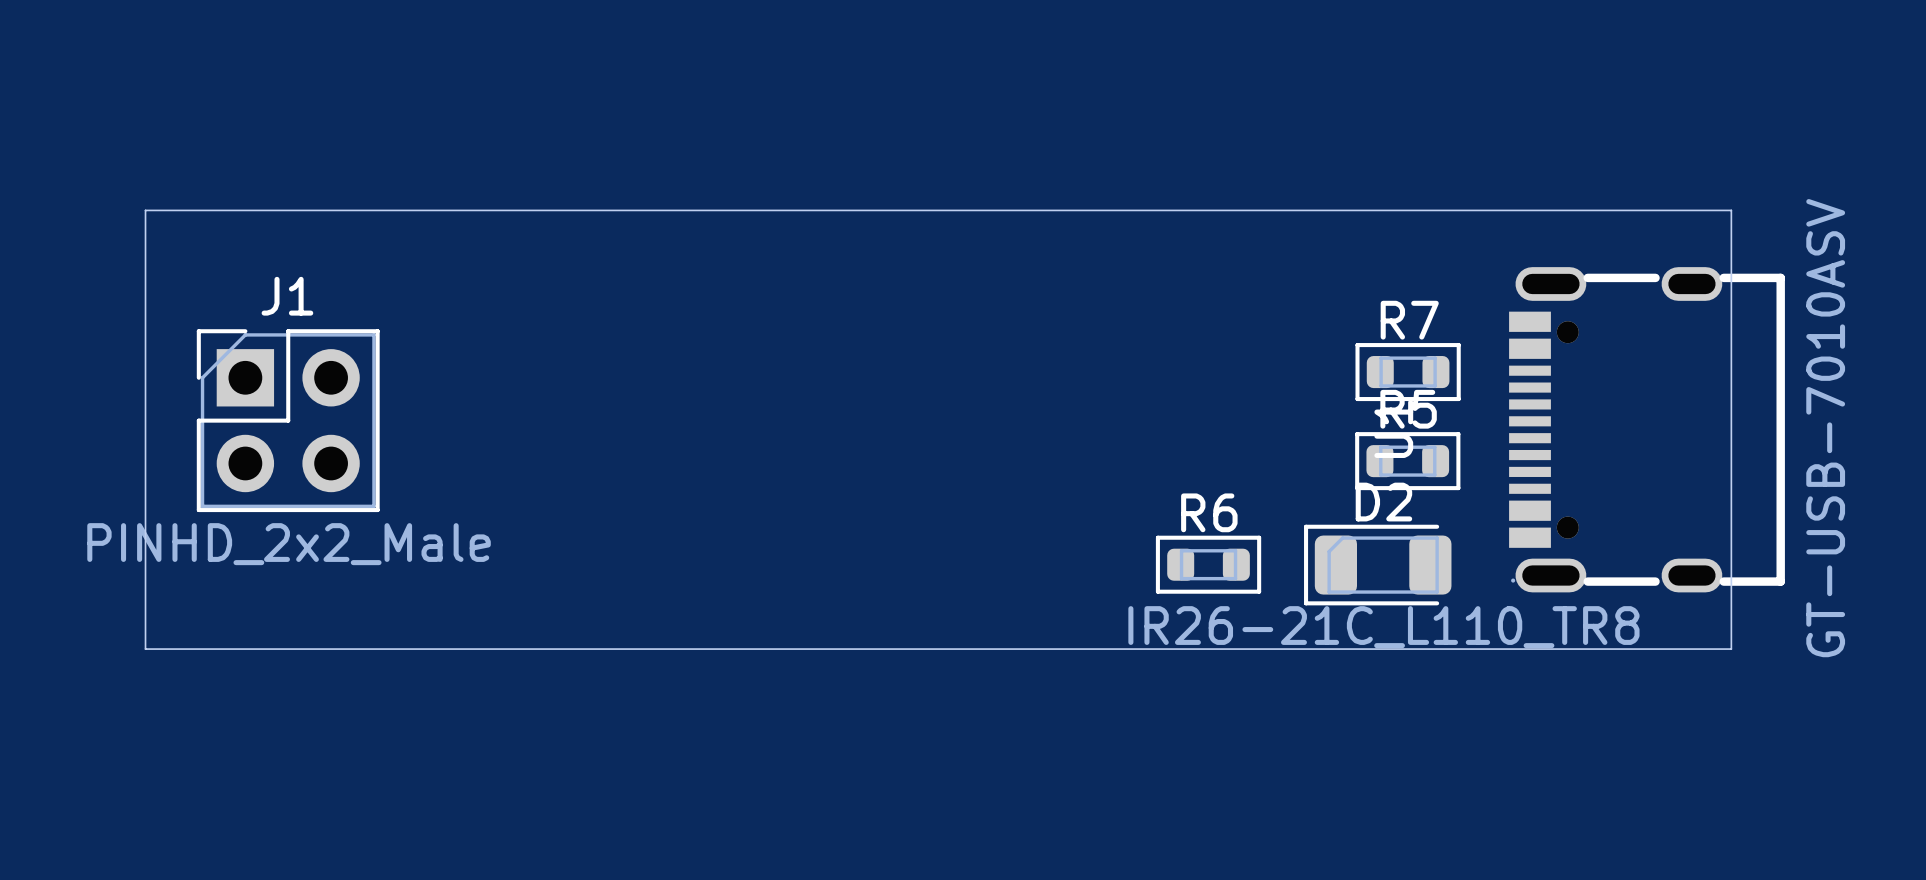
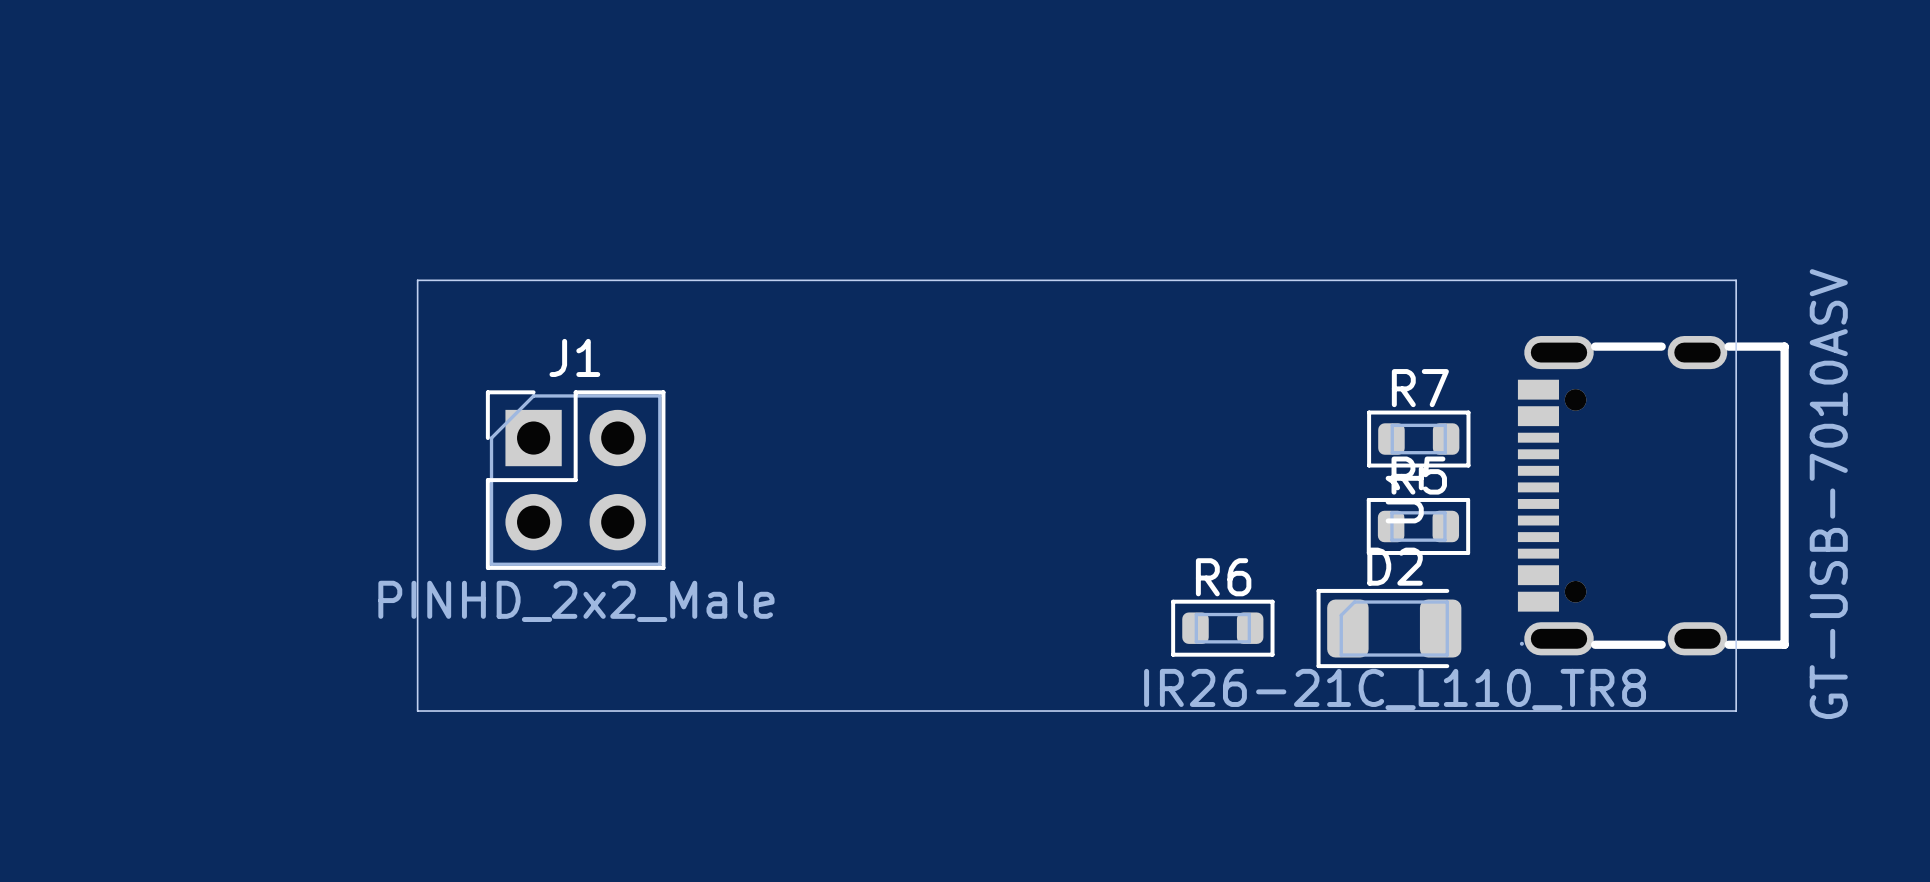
board edge: (388, 210) (145, 210) (145, 649) (388, 649) -> (417, 280) (417, 711)
J1 position: (288, 420) -> (575, 480)

